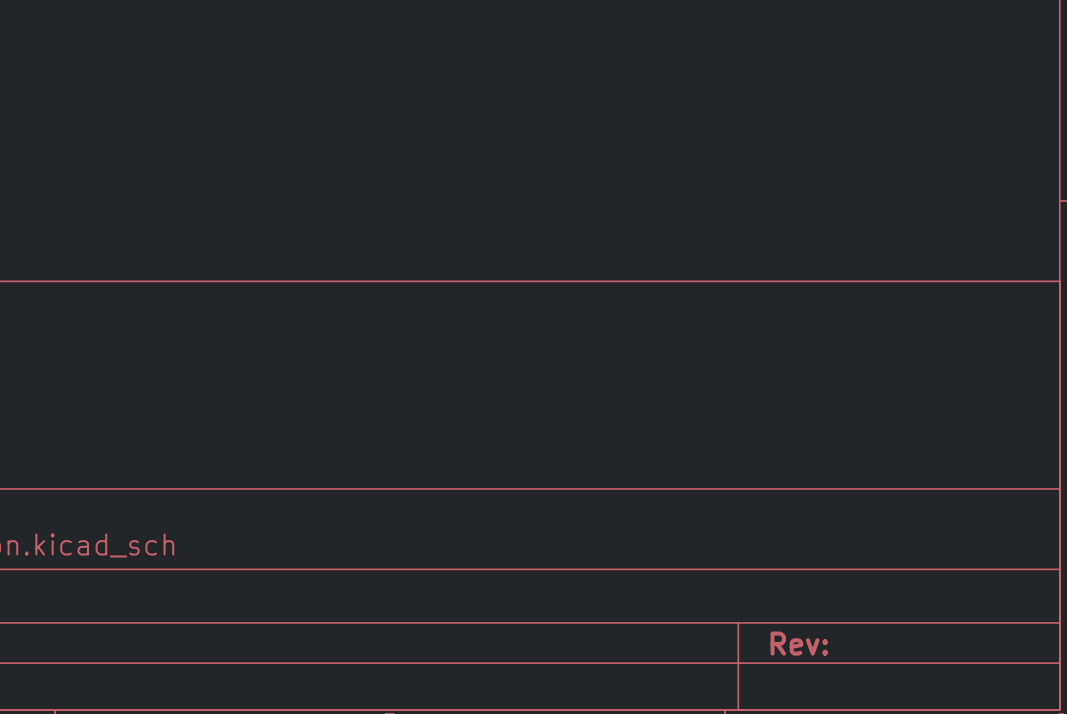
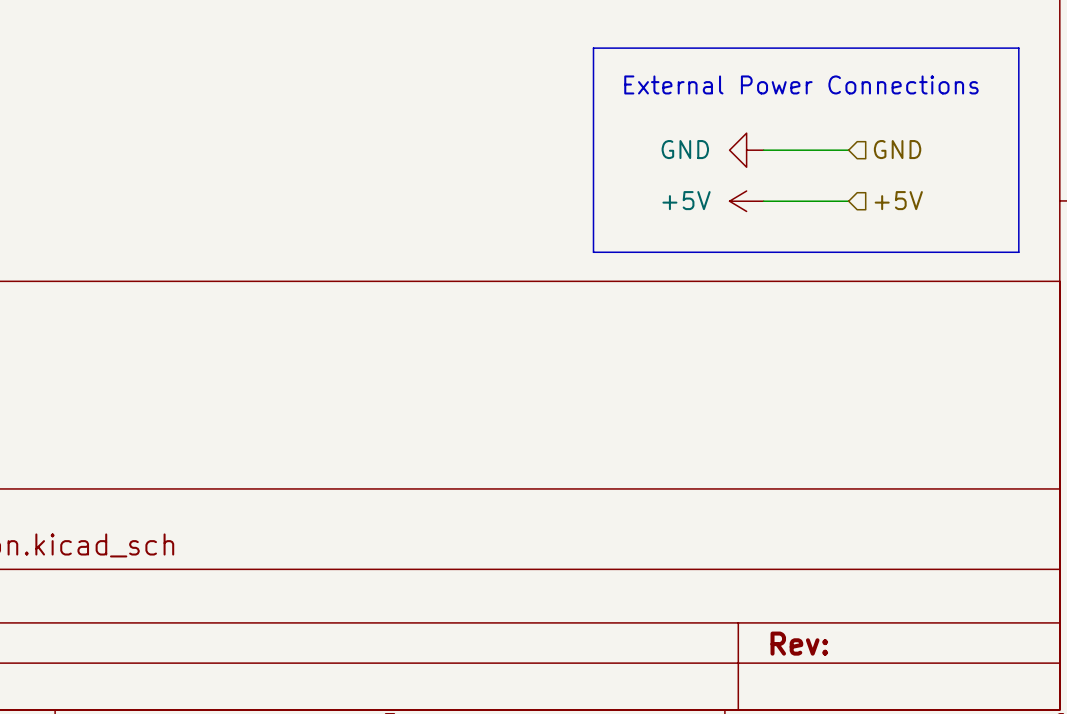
line: none -> (593, 48) (1018, 48) (1018, 252) (593, 252) (593, 48)
text: none -> External Power Connections (801, 84)
hierarchical label: none -> GND (897, 149)
power symbol: none -> GND (746, 150)
wire: none -> (763, 150) (848, 150)
hierarchical label: none -> +5V (898, 200)
power symbol: none -> +5V (746, 201)
wire: none -> (763, 201) (848, 201)

